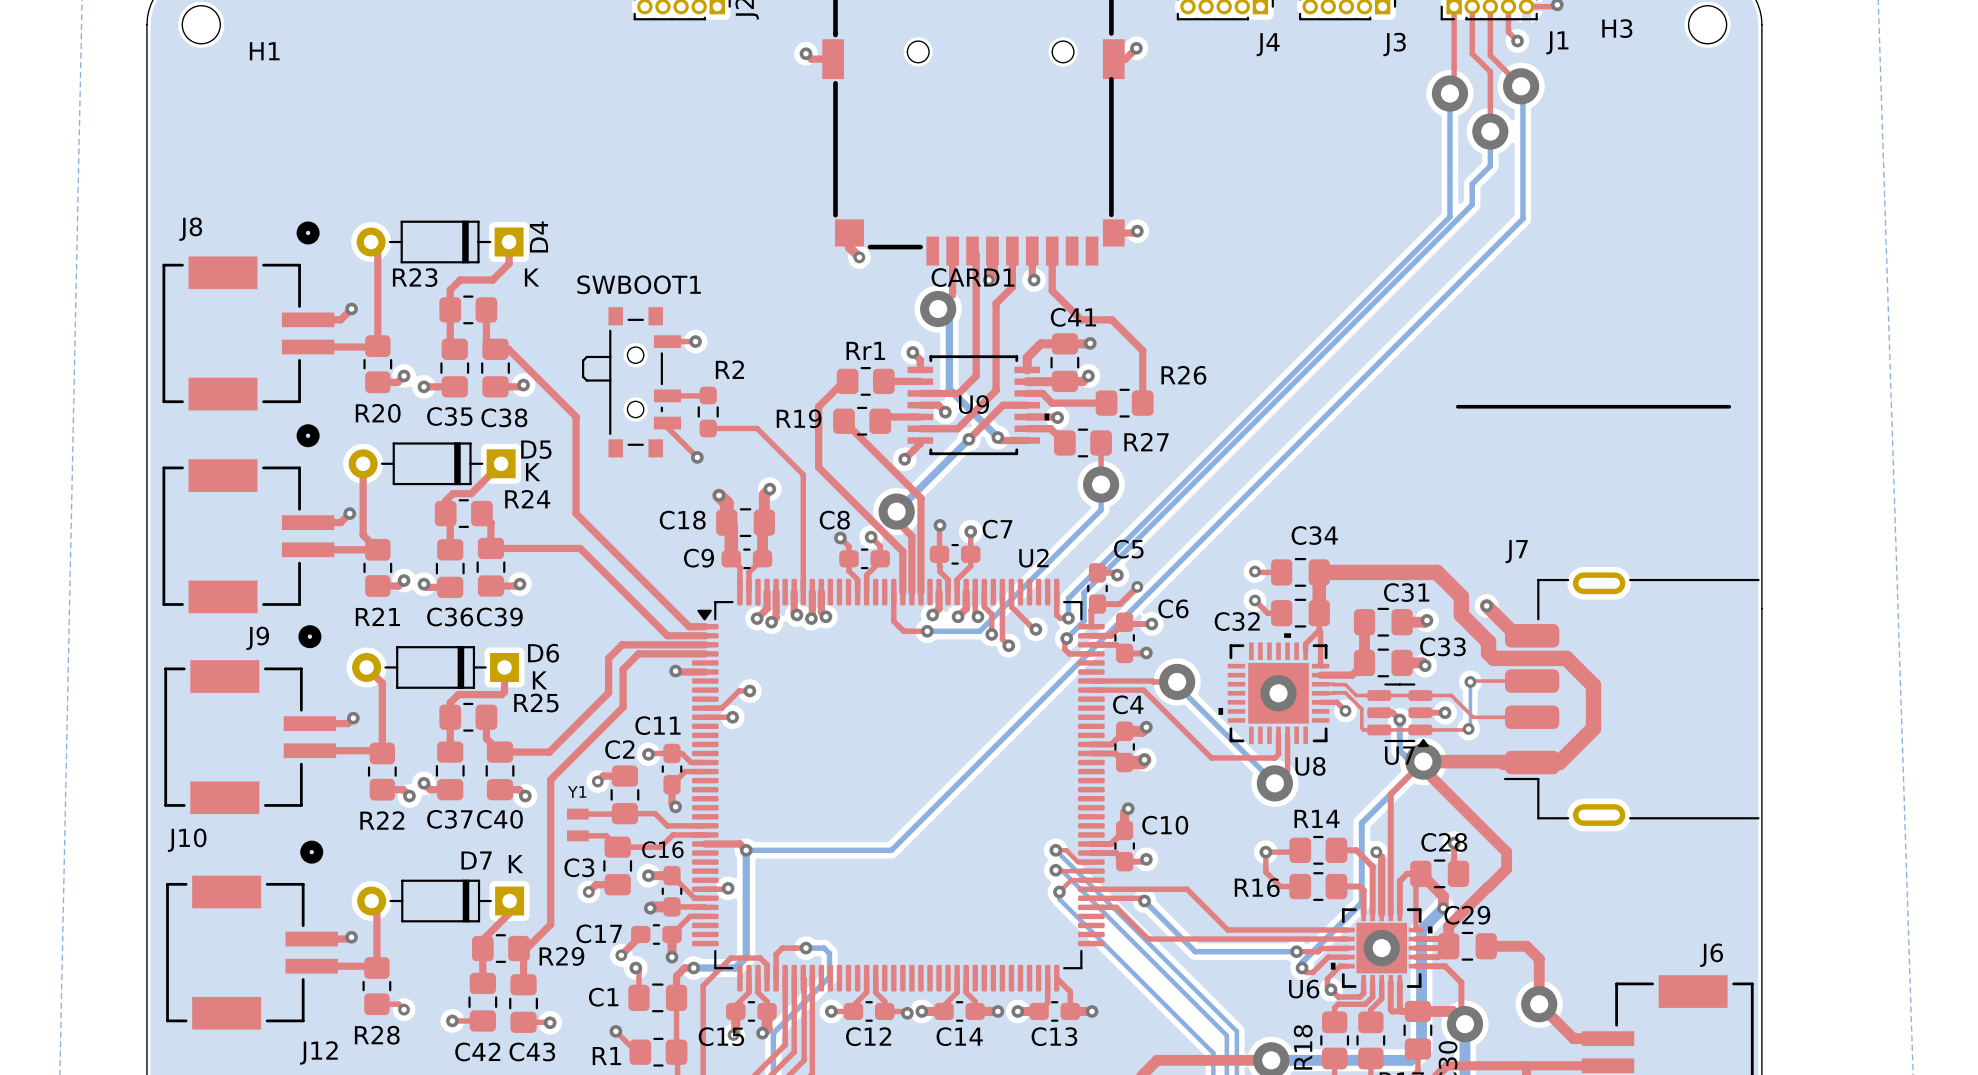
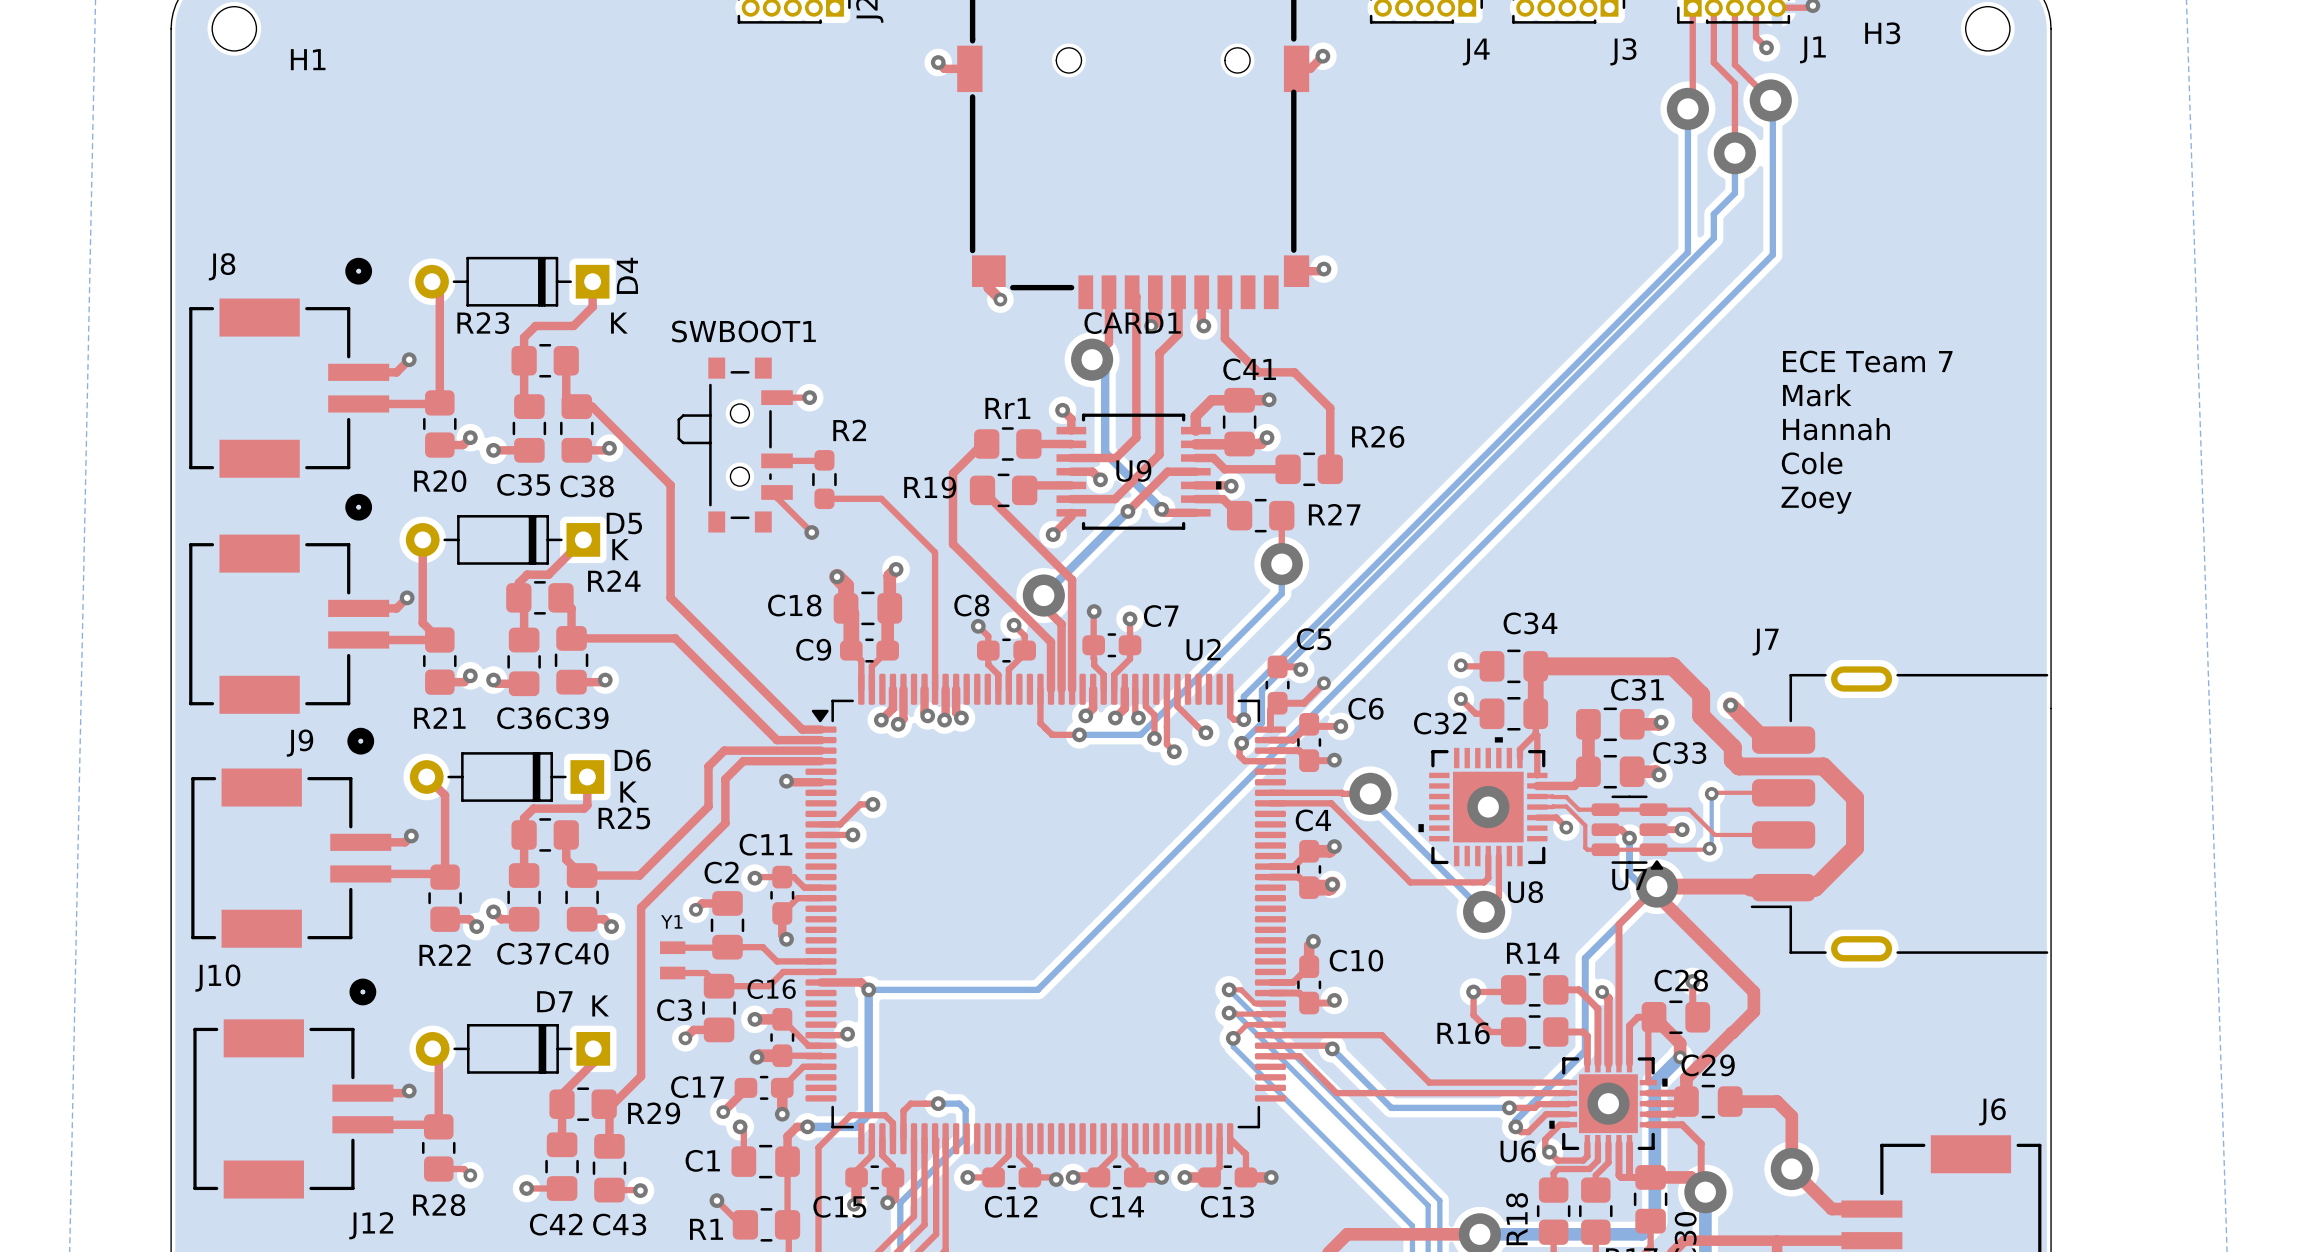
text: none -> ECE Team 7 (1867, 361)
text: none -> Mark (1817, 395)
text: none -> Hannah (1836, 429)
text: none -> Cole (1812, 463)
line: (1457, 406) (1729, 406) -> none
text: none -> Zoey (1816, 500)

